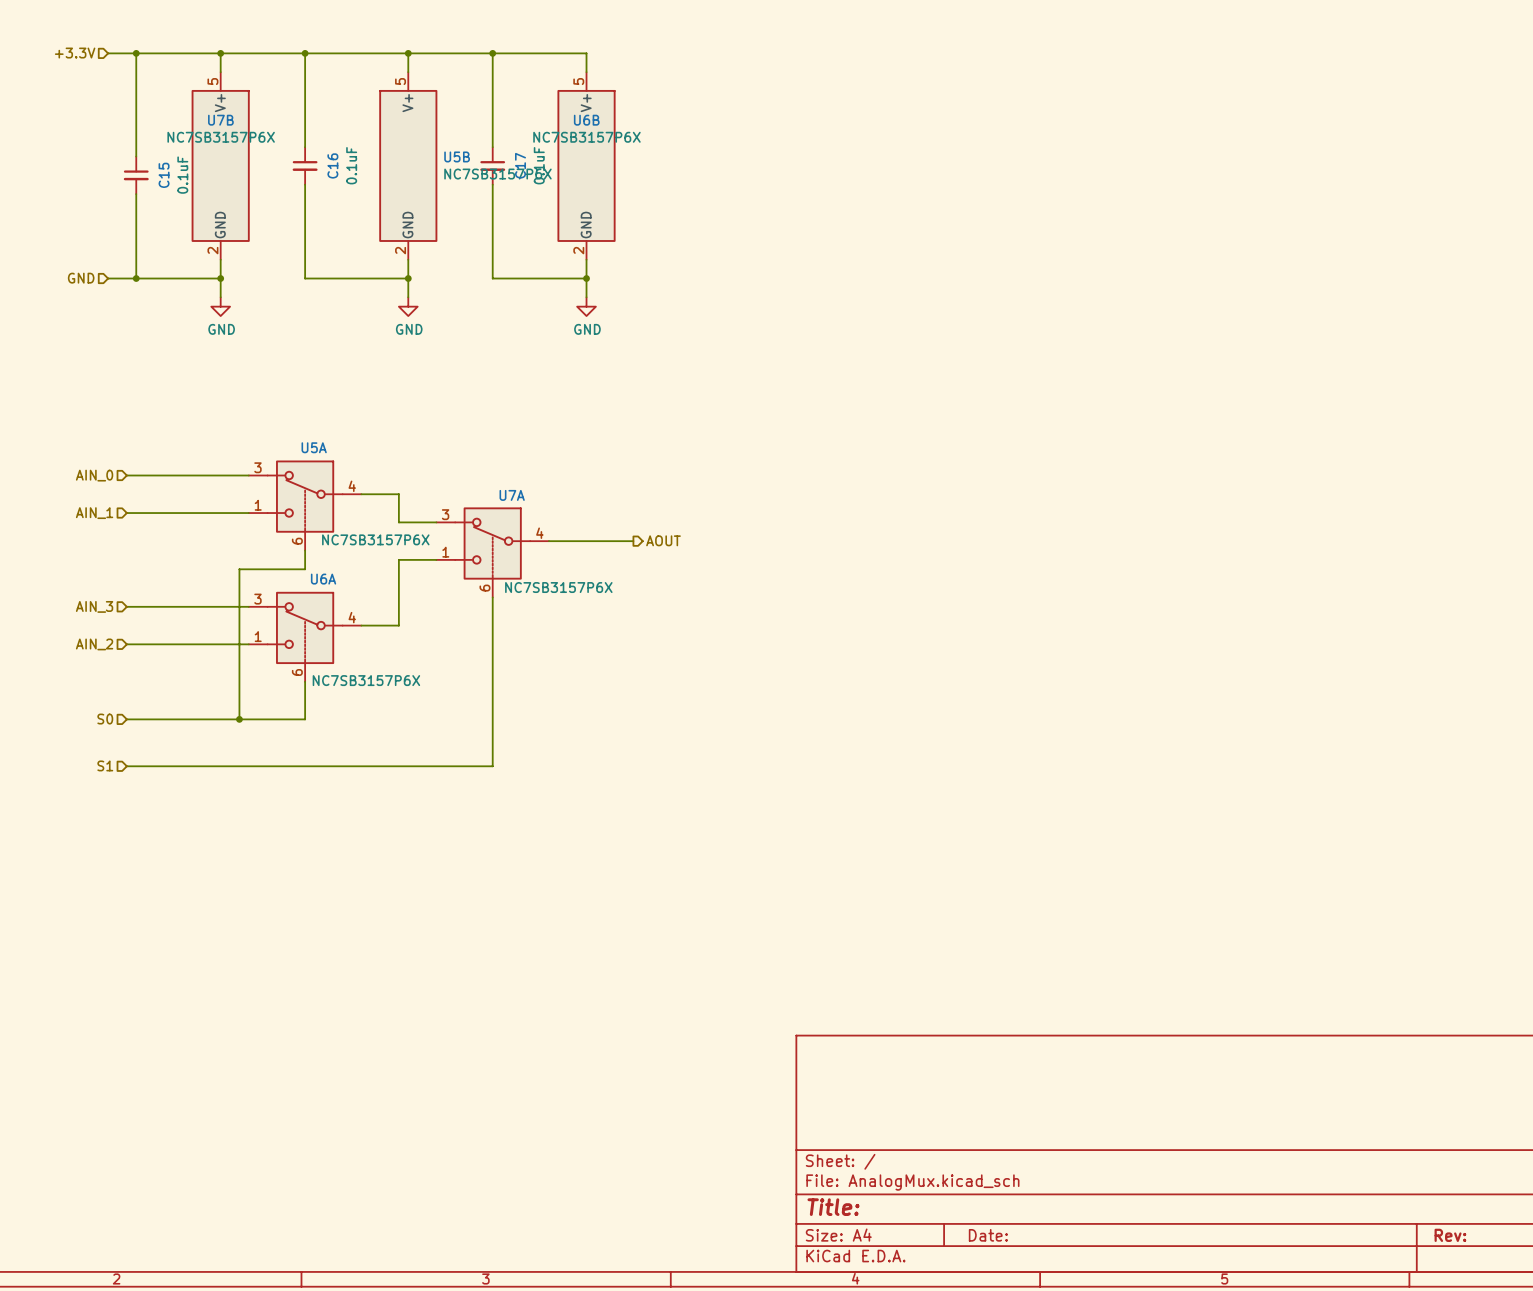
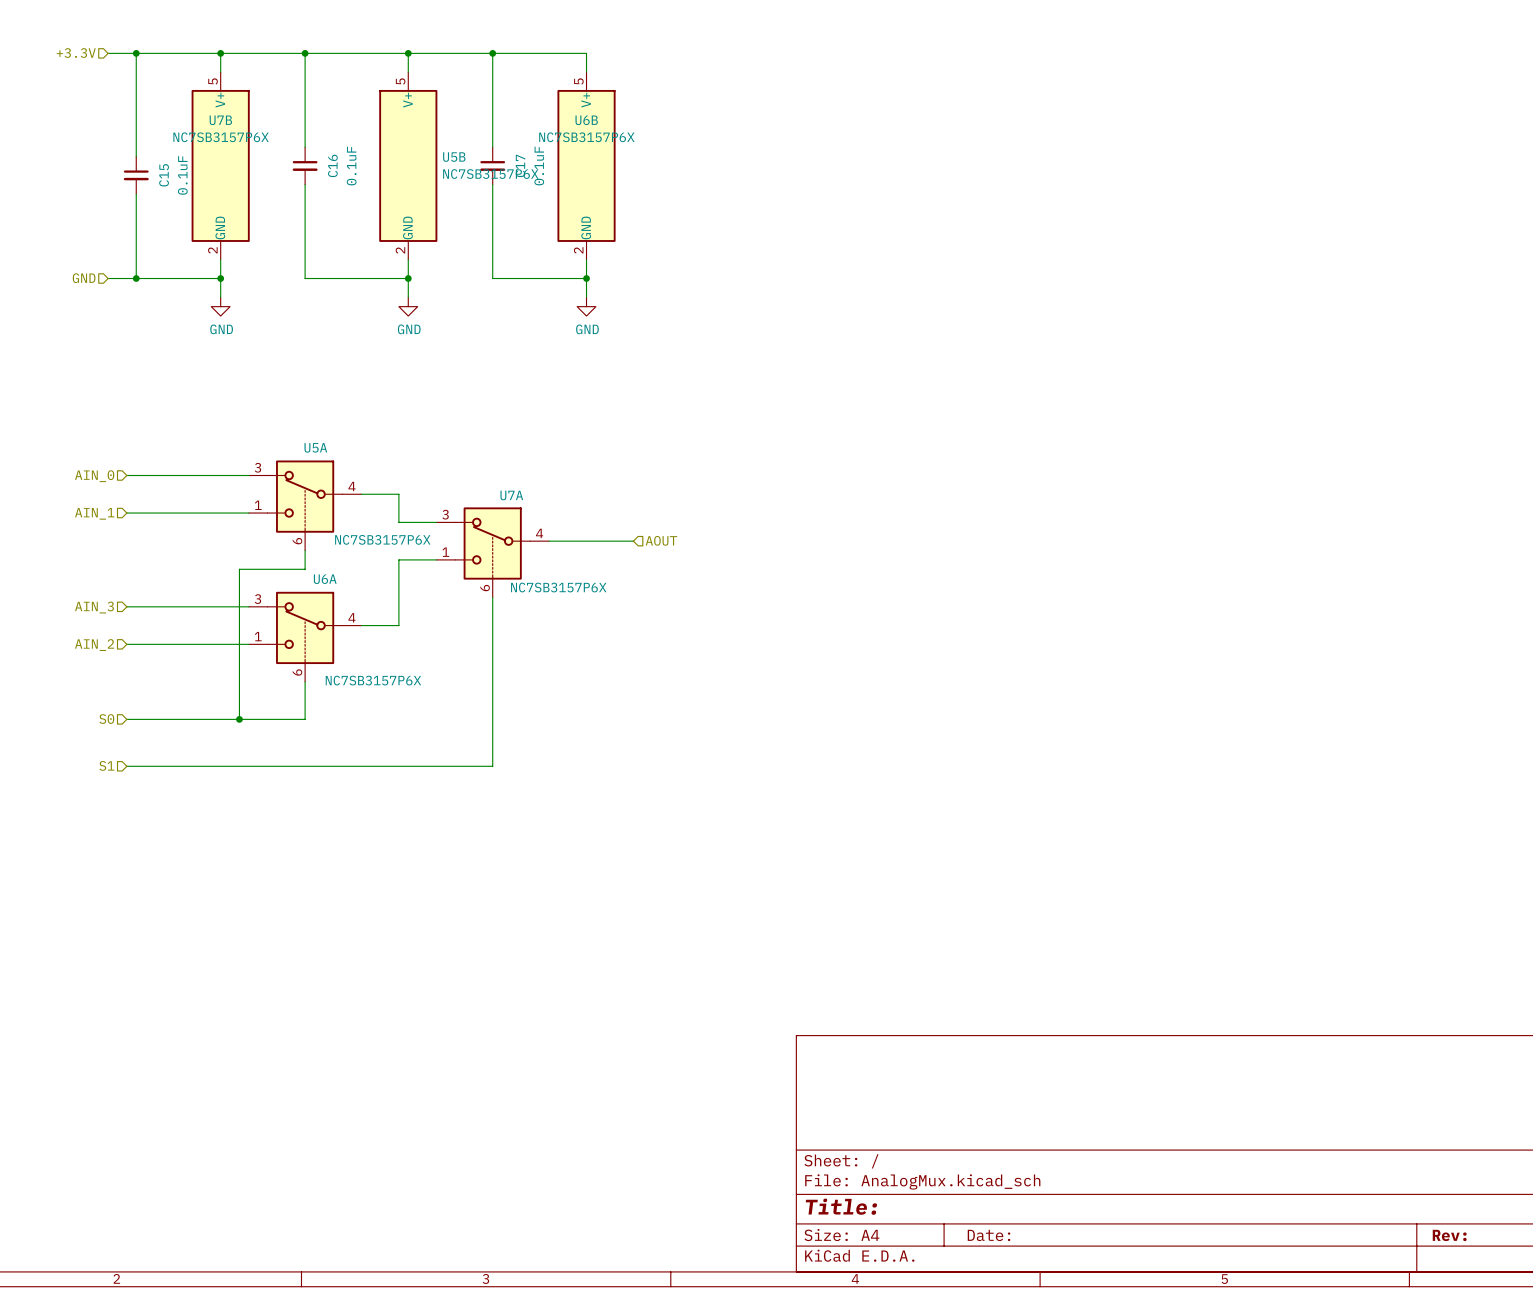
hierarchical label shape: output (663, 540) -> input (661, 540)

